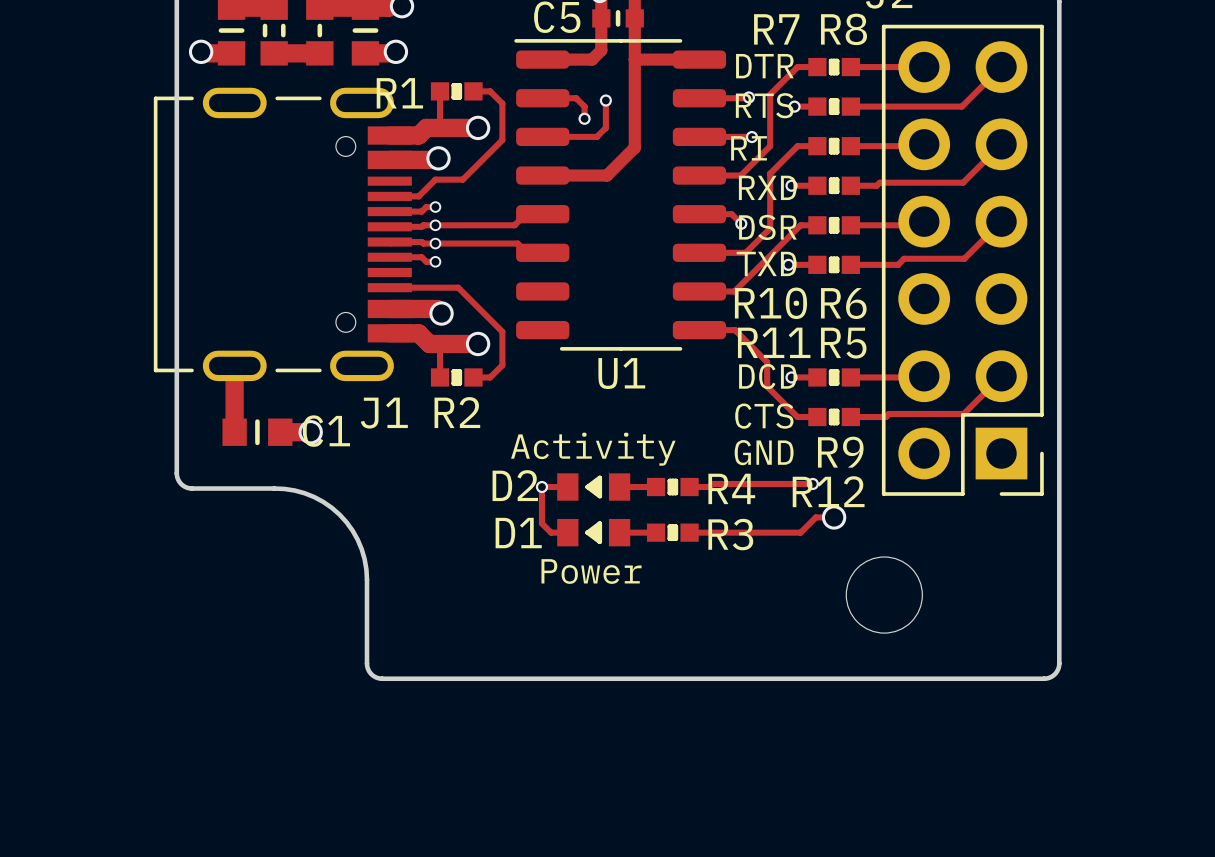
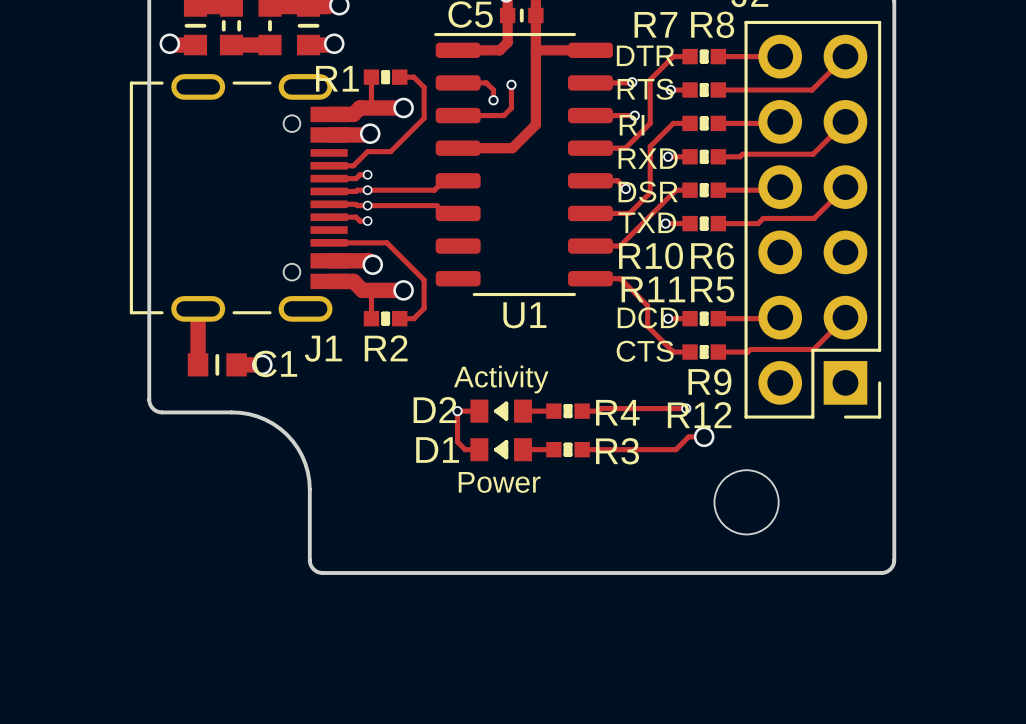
text: GND (764, 452) -> none

